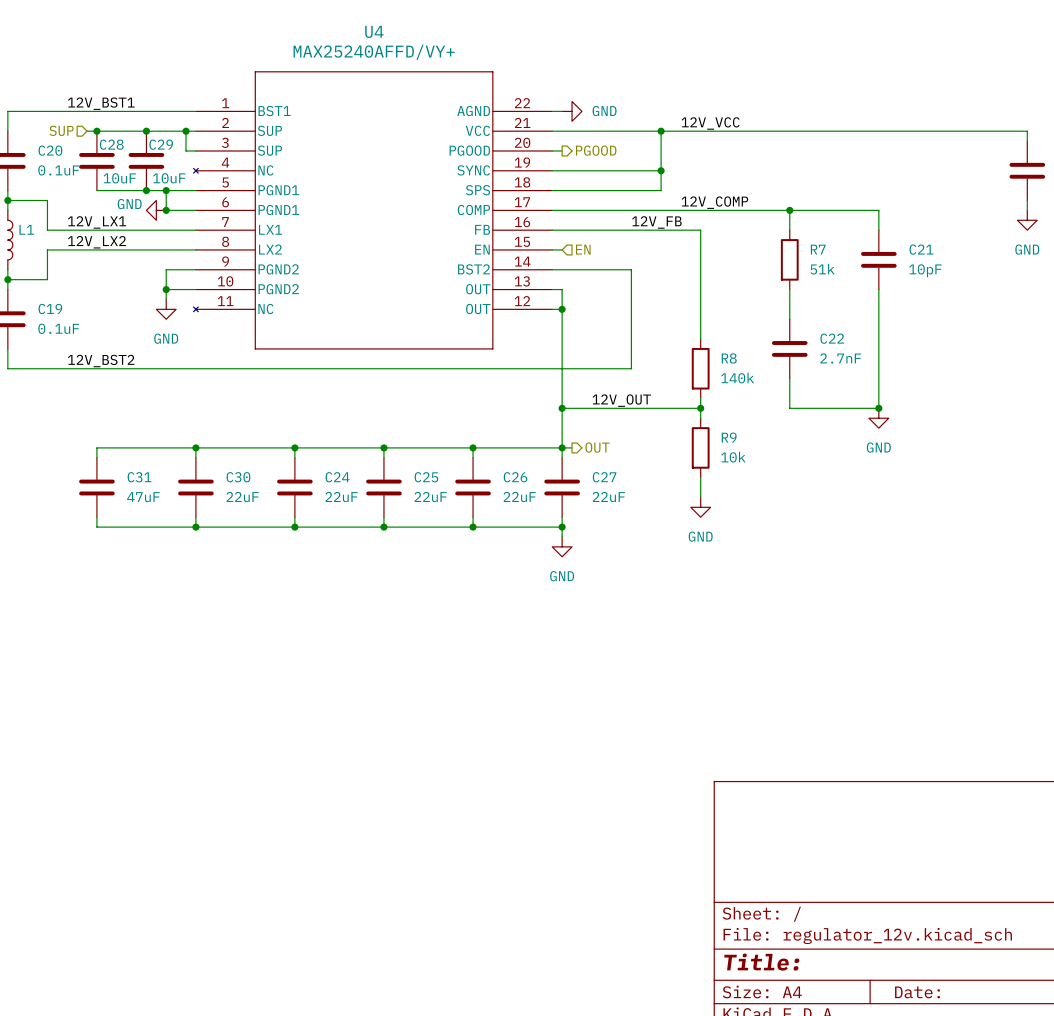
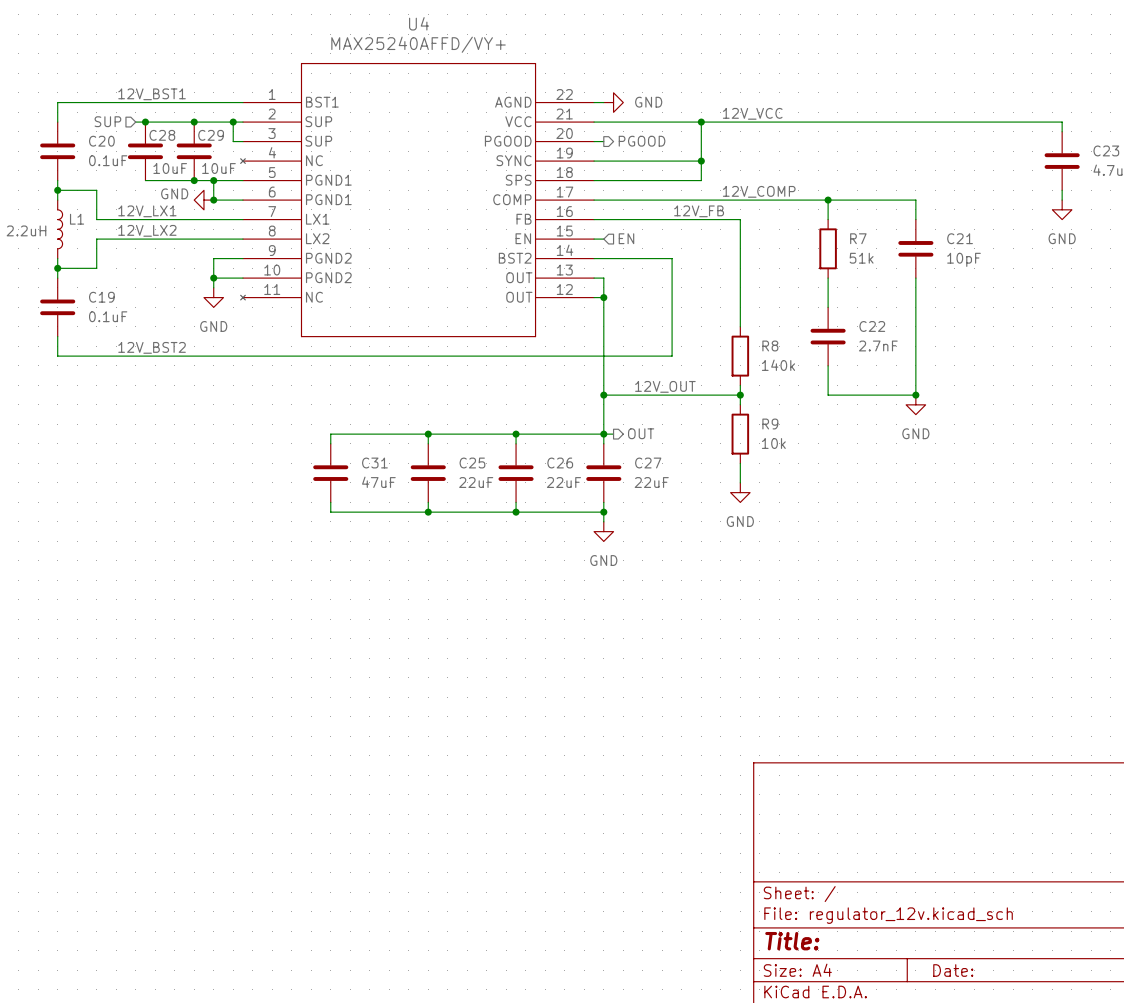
wire: (195, 447) (195, 457) -> none
junction: (195, 447) -> none
wire: (284, 447) (96, 447) (96, 457) -> (330, 434) (330, 443)
wire: (294, 447) (294, 457) -> none
junction: (294, 447) -> none
C31 position: (96, 487) -> (330, 473)
C30: 22uF (195, 487) -> none
C24: 22uF (294, 487) -> none
wire: (96, 517) (96, 527) (284, 527) -> (330, 502) (330, 512)
wire: (195, 517) (195, 527) -> none
wire: (294, 517) (294, 527) -> none
junction: (195, 527) -> none
junction: (294, 527) -> none

